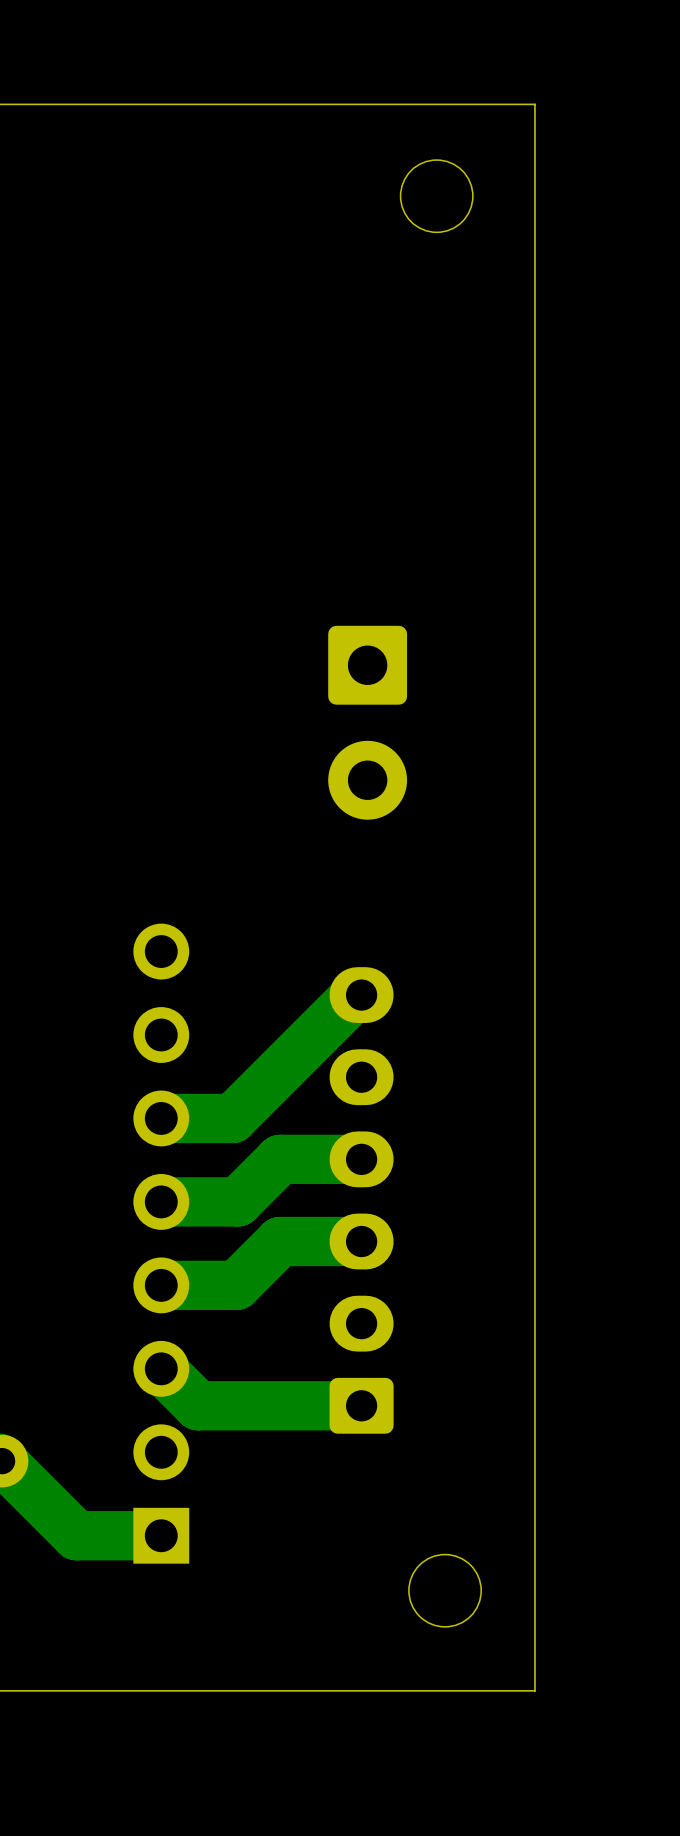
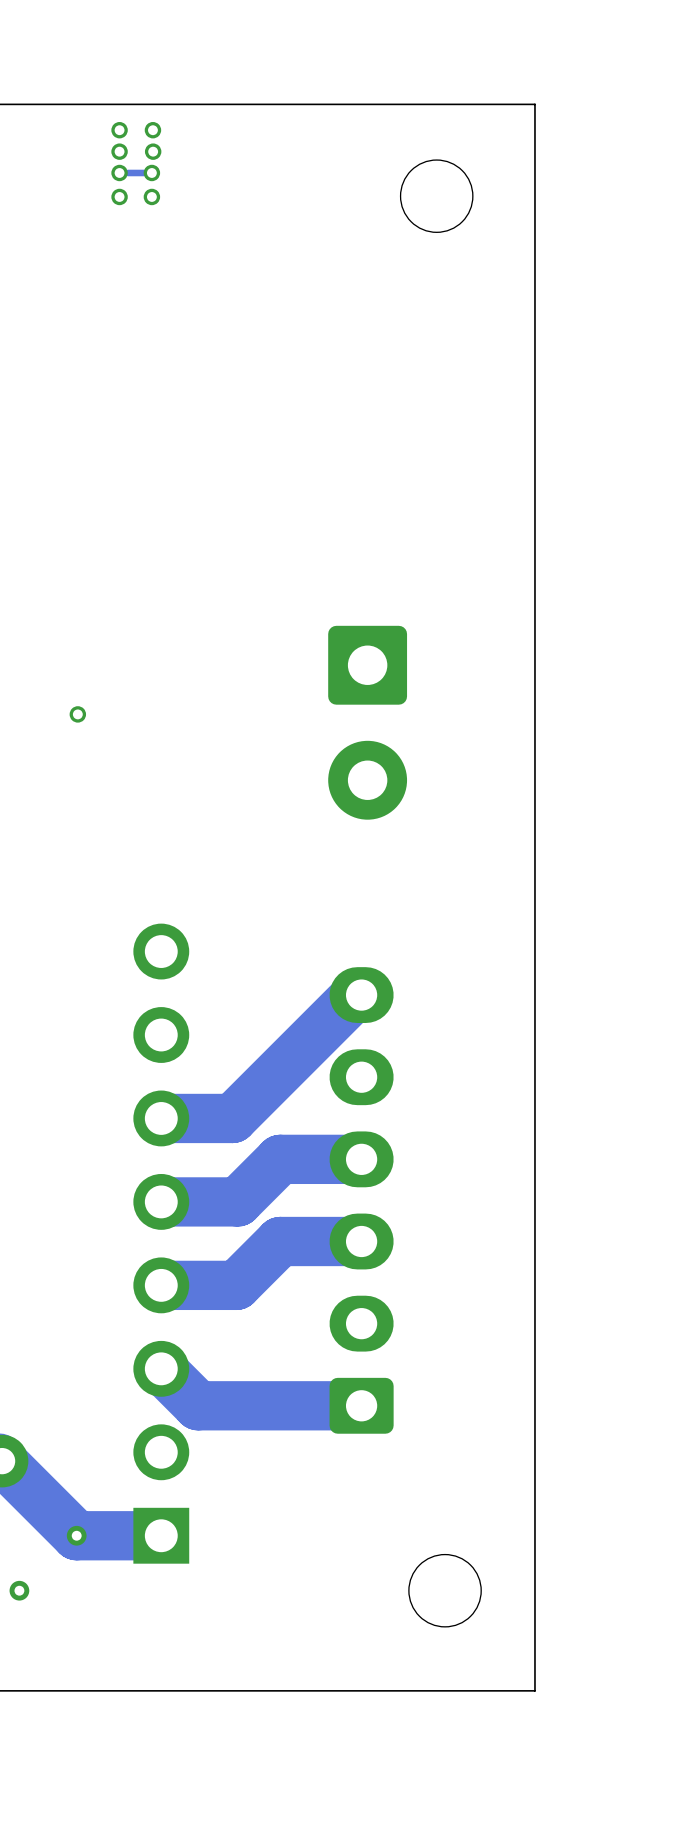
via: none -> (119, 130)
via: none -> (152, 130)
via: none -> (119, 151)
via: none -> (153, 151)
via: none -> (119, 172)
track: none -> (151, 172) (127, 172)
via: none -> (151, 172)
via: none -> (119, 196)
via: none -> (151, 196)
via: none -> (77, 714)
via: none -> (76, 1535)
via: none -> (19, 1590)

